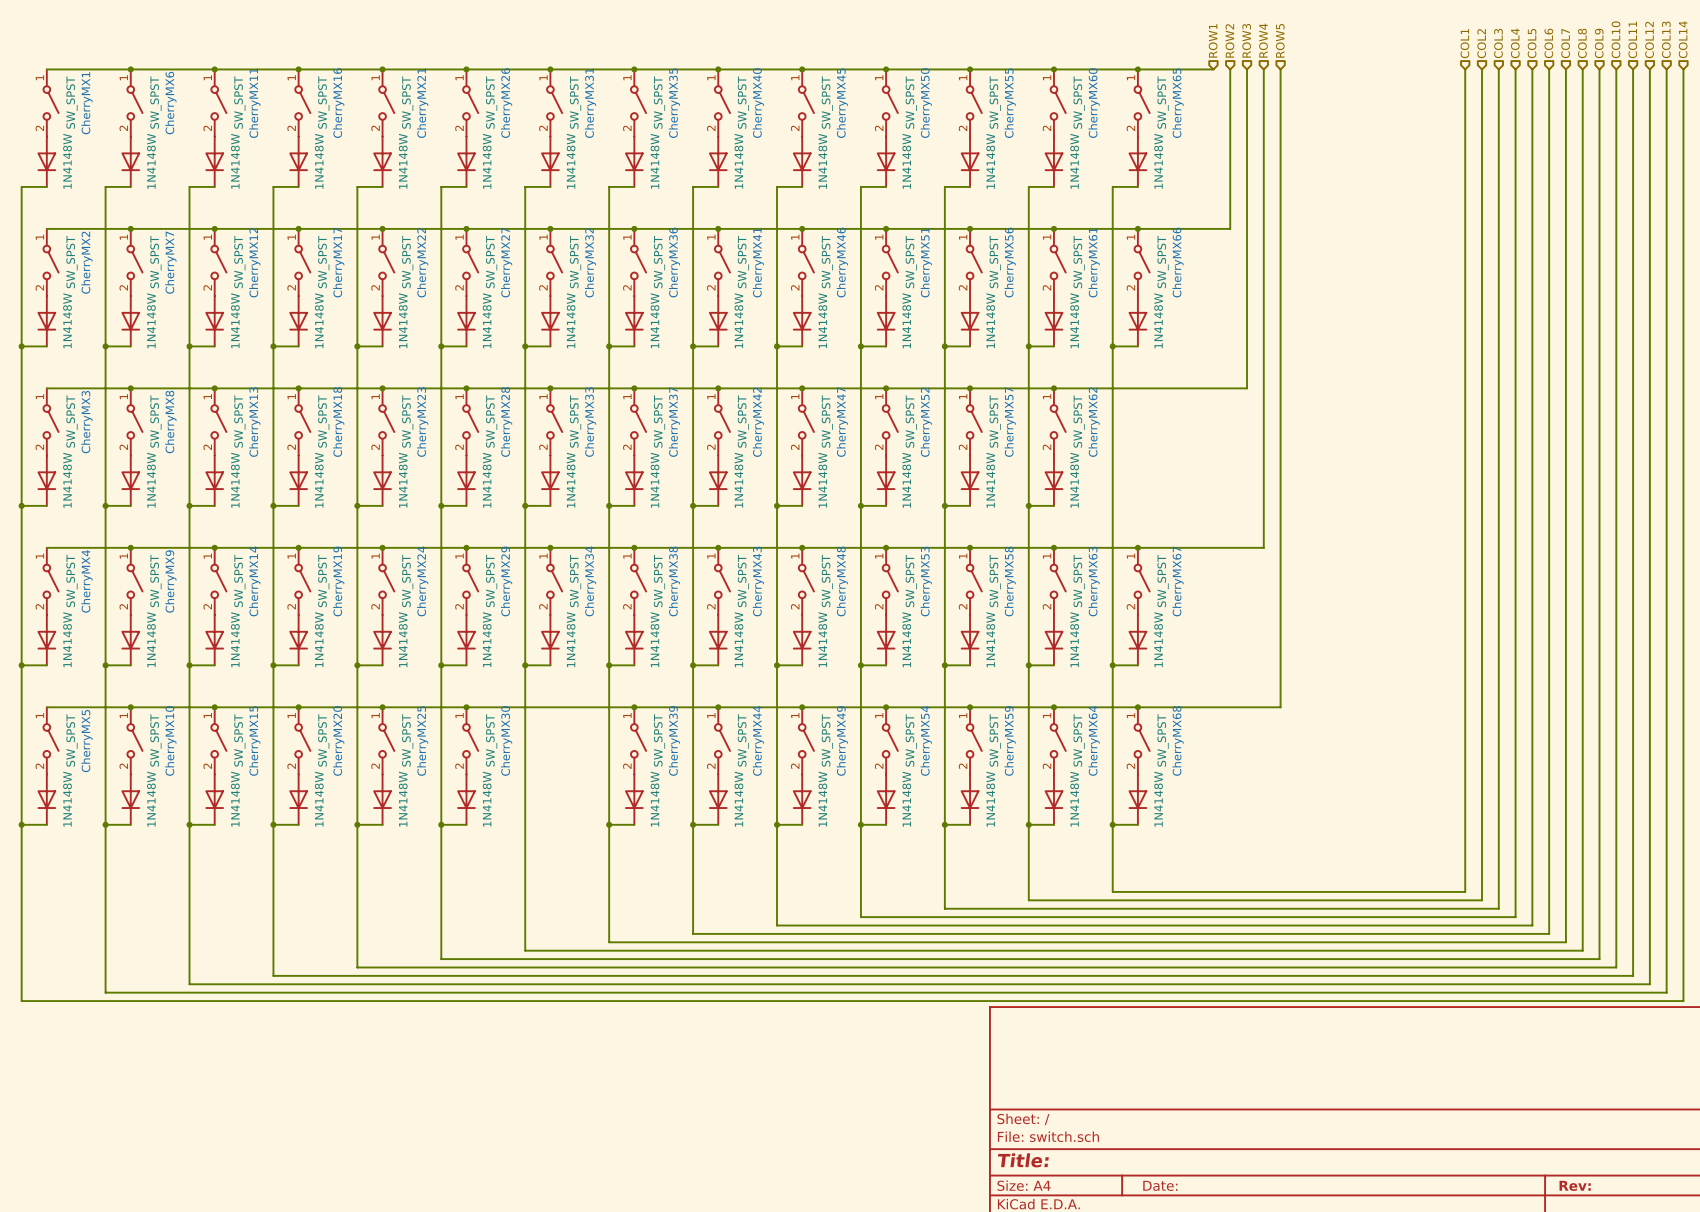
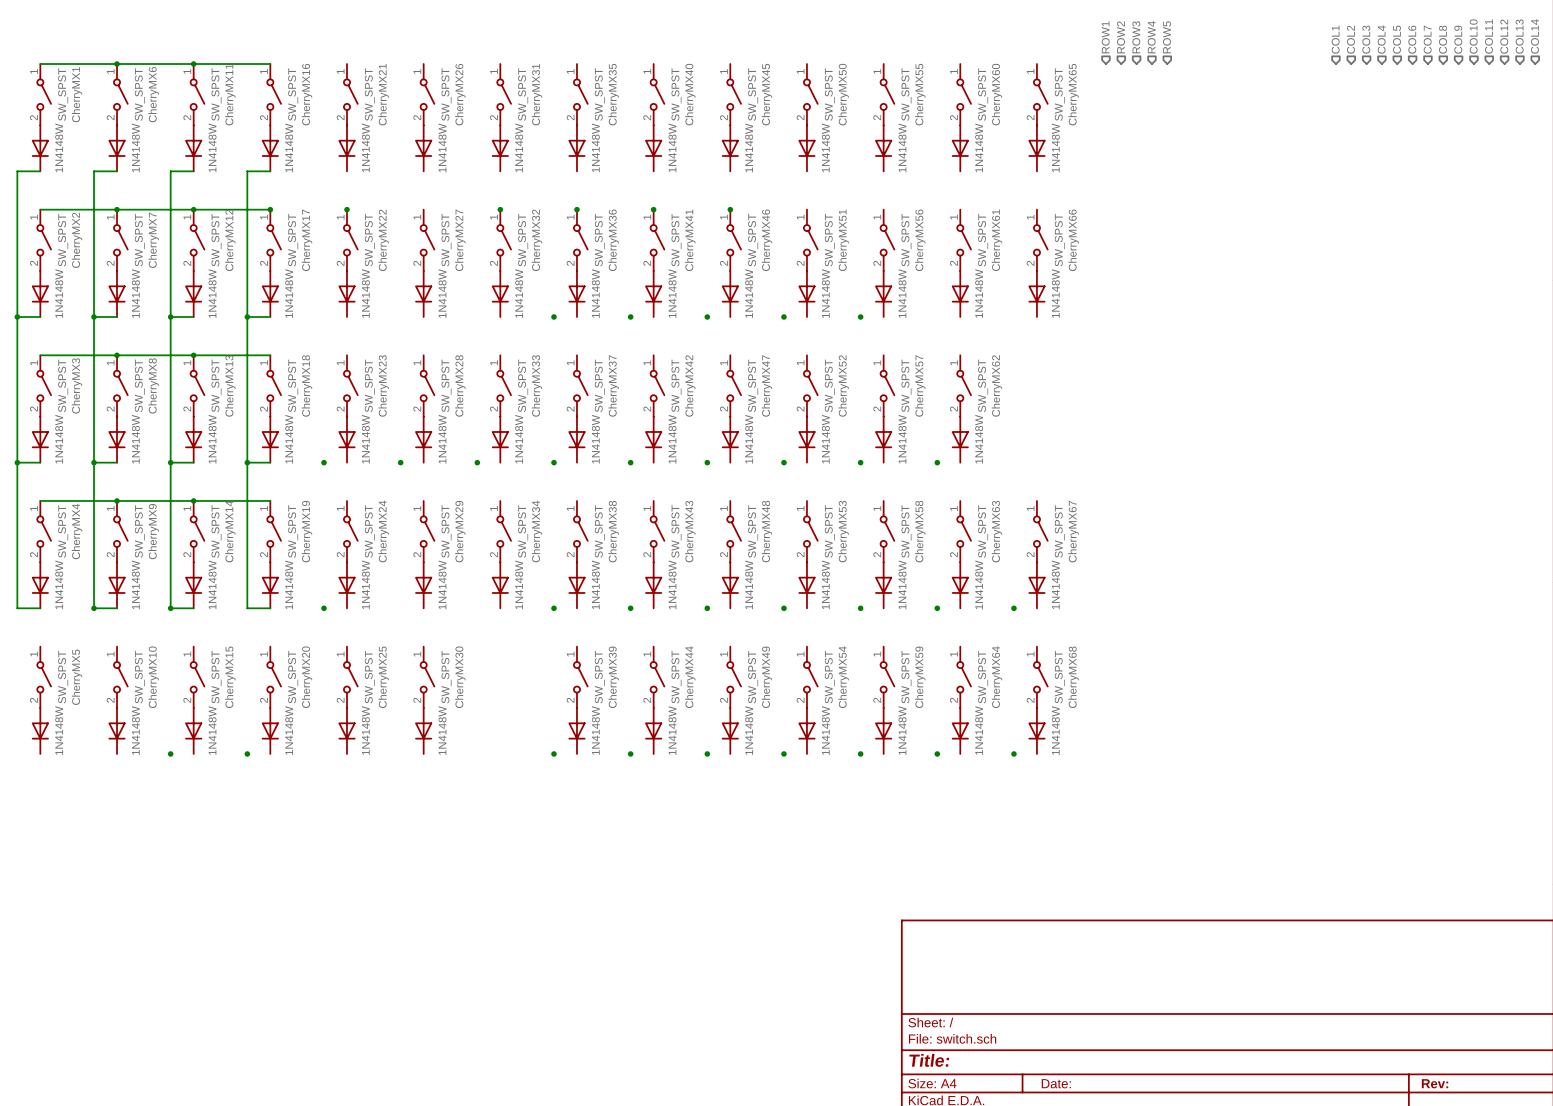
wire: (298, 69) (1213, 69) -> none
junction: (298, 69) -> none
junction: (382, 69) -> none
junction: (466, 69) -> none
junction: (550, 69) -> none
junction: (634, 69) -> none
junction: (718, 69) -> none
junction: (802, 69) -> none
junction: (886, 69) -> none
junction: (970, 69) -> none
junction: (1053, 69) -> none
junction: (1137, 69) -> none
wire: (1230, 69) (1230, 228) (298, 228) -> none
wire: (1247, 69) (1247, 388) (298, 388) -> none
wire: (1263, 69) (1263, 547) (298, 547) -> none
wire: (1280, 69) (1280, 707) (46, 707) -> none
wire: (1465, 69) (1465, 891) (1112, 891) (1112, 186) (1137, 186) -> none
wire: (1482, 69) (1482, 900) (1028, 900) (1028, 186) (1053, 186) -> none
wire: (1498, 69) (1498, 908) (944, 908) (944, 186) (970, 186) -> none
wire: (1515, 69) (1515, 917) (860, 917) (860, 186) (886, 186) -> none
wire: (1532, 69) (1532, 925) (777, 925) (777, 186) (802, 186) -> none
wire: (1549, 69) (1549, 933) (693, 933) (693, 186) (718, 186) -> none
wire: (1565, 69) (1565, 942) (609, 942) (609, 186) (634, 186) -> none
wire: (1582, 69) (1582, 950) (525, 950) (525, 186) (550, 186) -> none
wire: (1599, 69) (1599, 959) (441, 959) (441, 186) (466, 186) -> none
wire: (1616, 69) (1616, 967) (357, 967) (357, 186) (382, 186) -> none
wire: (1633, 69) (1633, 975) (273, 975) (273, 665) -> none
wire: (1649, 69) (1649, 984) (189, 984) (189, 665) -> none
wire: (1666, 69) (1666, 992) (105, 992) (105, 665) -> none
wire: (1683, 69) (1683, 1001) (21, 1001) (21, 665) -> none
junction: (466, 228) -> none
junction: (886, 228) -> none
junction: (970, 228) -> none
junction: (1053, 228) -> none
junction: (1137, 228) -> none
wire: (357, 346) (382, 346) -> none
junction: (357, 346) -> none
wire: (441, 346) (466, 346) -> none
junction: (441, 346) -> none
wire: (525, 346) (550, 346) -> none
junction: (525, 346) -> none
wire: (609, 346) (634, 346) -> none
wire: (693, 346) (718, 346) -> none
wire: (777, 346) (802, 346) -> none
wire: (860, 346) (886, 346) -> none
wire: (944, 346) (970, 346) -> none
wire: (1028, 346) (1053, 346) -> none
junction: (1028, 346) -> none
wire: (1112, 346) (1137, 346) -> none
junction: (1112, 346) -> none
junction: (298, 388) -> none
junction: (382, 388) -> none
junction: (466, 388) -> none
junction: (550, 388) -> none
junction: (634, 388) -> none
junction: (718, 388) -> none
junction: (802, 388) -> none
junction: (886, 388) -> none
junction: (970, 388) -> none
junction: (1053, 388) -> none
wire: (357, 505) (382, 505) -> none
wire: (441, 505) (466, 505) -> none
wire: (525, 505) (550, 505) -> none
wire: (609, 505) (634, 505) -> none
wire: (693, 505) (718, 505) -> none
wire: (777, 505) (802, 505) -> none
wire: (860, 505) (886, 505) -> none
wire: (944, 505) (970, 505) -> none
wire: (1028, 505) (1053, 505) -> none
junction: (298, 547) -> none
junction: (382, 547) -> none
junction: (466, 547) -> none
junction: (550, 547) -> none
junction: (634, 547) -> none
junction: (718, 547) -> none
junction: (802, 547) -> none
junction: (886, 547) -> none
junction: (970, 547) -> none
junction: (1053, 547) -> none
junction: (1137, 547) -> none
junction: (21, 665) -> none
junction: (273, 665) -> none
wire: (357, 665) (382, 665) -> none
wire: (441, 665) (466, 665) -> none
junction: (441, 665) -> none
wire: (525, 665) (550, 665) -> none
junction: (525, 665) -> none
wire: (609, 665) (634, 665) -> none
wire: (693, 665) (718, 665) -> none
wire: (777, 665) (802, 665) -> none
wire: (860, 665) (886, 665) -> none
wire: (944, 665) (970, 665) -> none
wire: (1028, 665) (1053, 665) -> none
wire: (1112, 665) (1137, 665) -> none
junction: (130, 707) -> none
junction: (214, 707) -> none
junction: (298, 707) -> none
junction: (382, 707) -> none
junction: (466, 707) -> none
junction: (634, 707) -> none
junction: (718, 707) -> none
junction: (802, 707) -> none
junction: (886, 707) -> none
junction: (970, 707) -> none
junction: (1053, 707) -> none
junction: (1137, 707) -> none
wire: (21, 824) (46, 824) -> none
junction: (21, 824) -> none
wire: (105, 824) (130, 824) -> none
junction: (105, 824) -> none
wire: (189, 824) (214, 824) -> none
wire: (273, 824) (298, 824) -> none
wire: (357, 824) (382, 824) -> none
junction: (357, 824) -> none
wire: (441, 824) (466, 824) -> none
junction: (441, 824) -> none
wire: (609, 824) (634, 824) -> none
wire: (693, 824) (718, 824) -> none
wire: (777, 824) (802, 824) -> none
wire: (860, 824) (886, 824) -> none
wire: (944, 824) (970, 824) -> none
wire: (1028, 824) (1053, 824) -> none
wire: (1112, 824) (1137, 824) -> none

